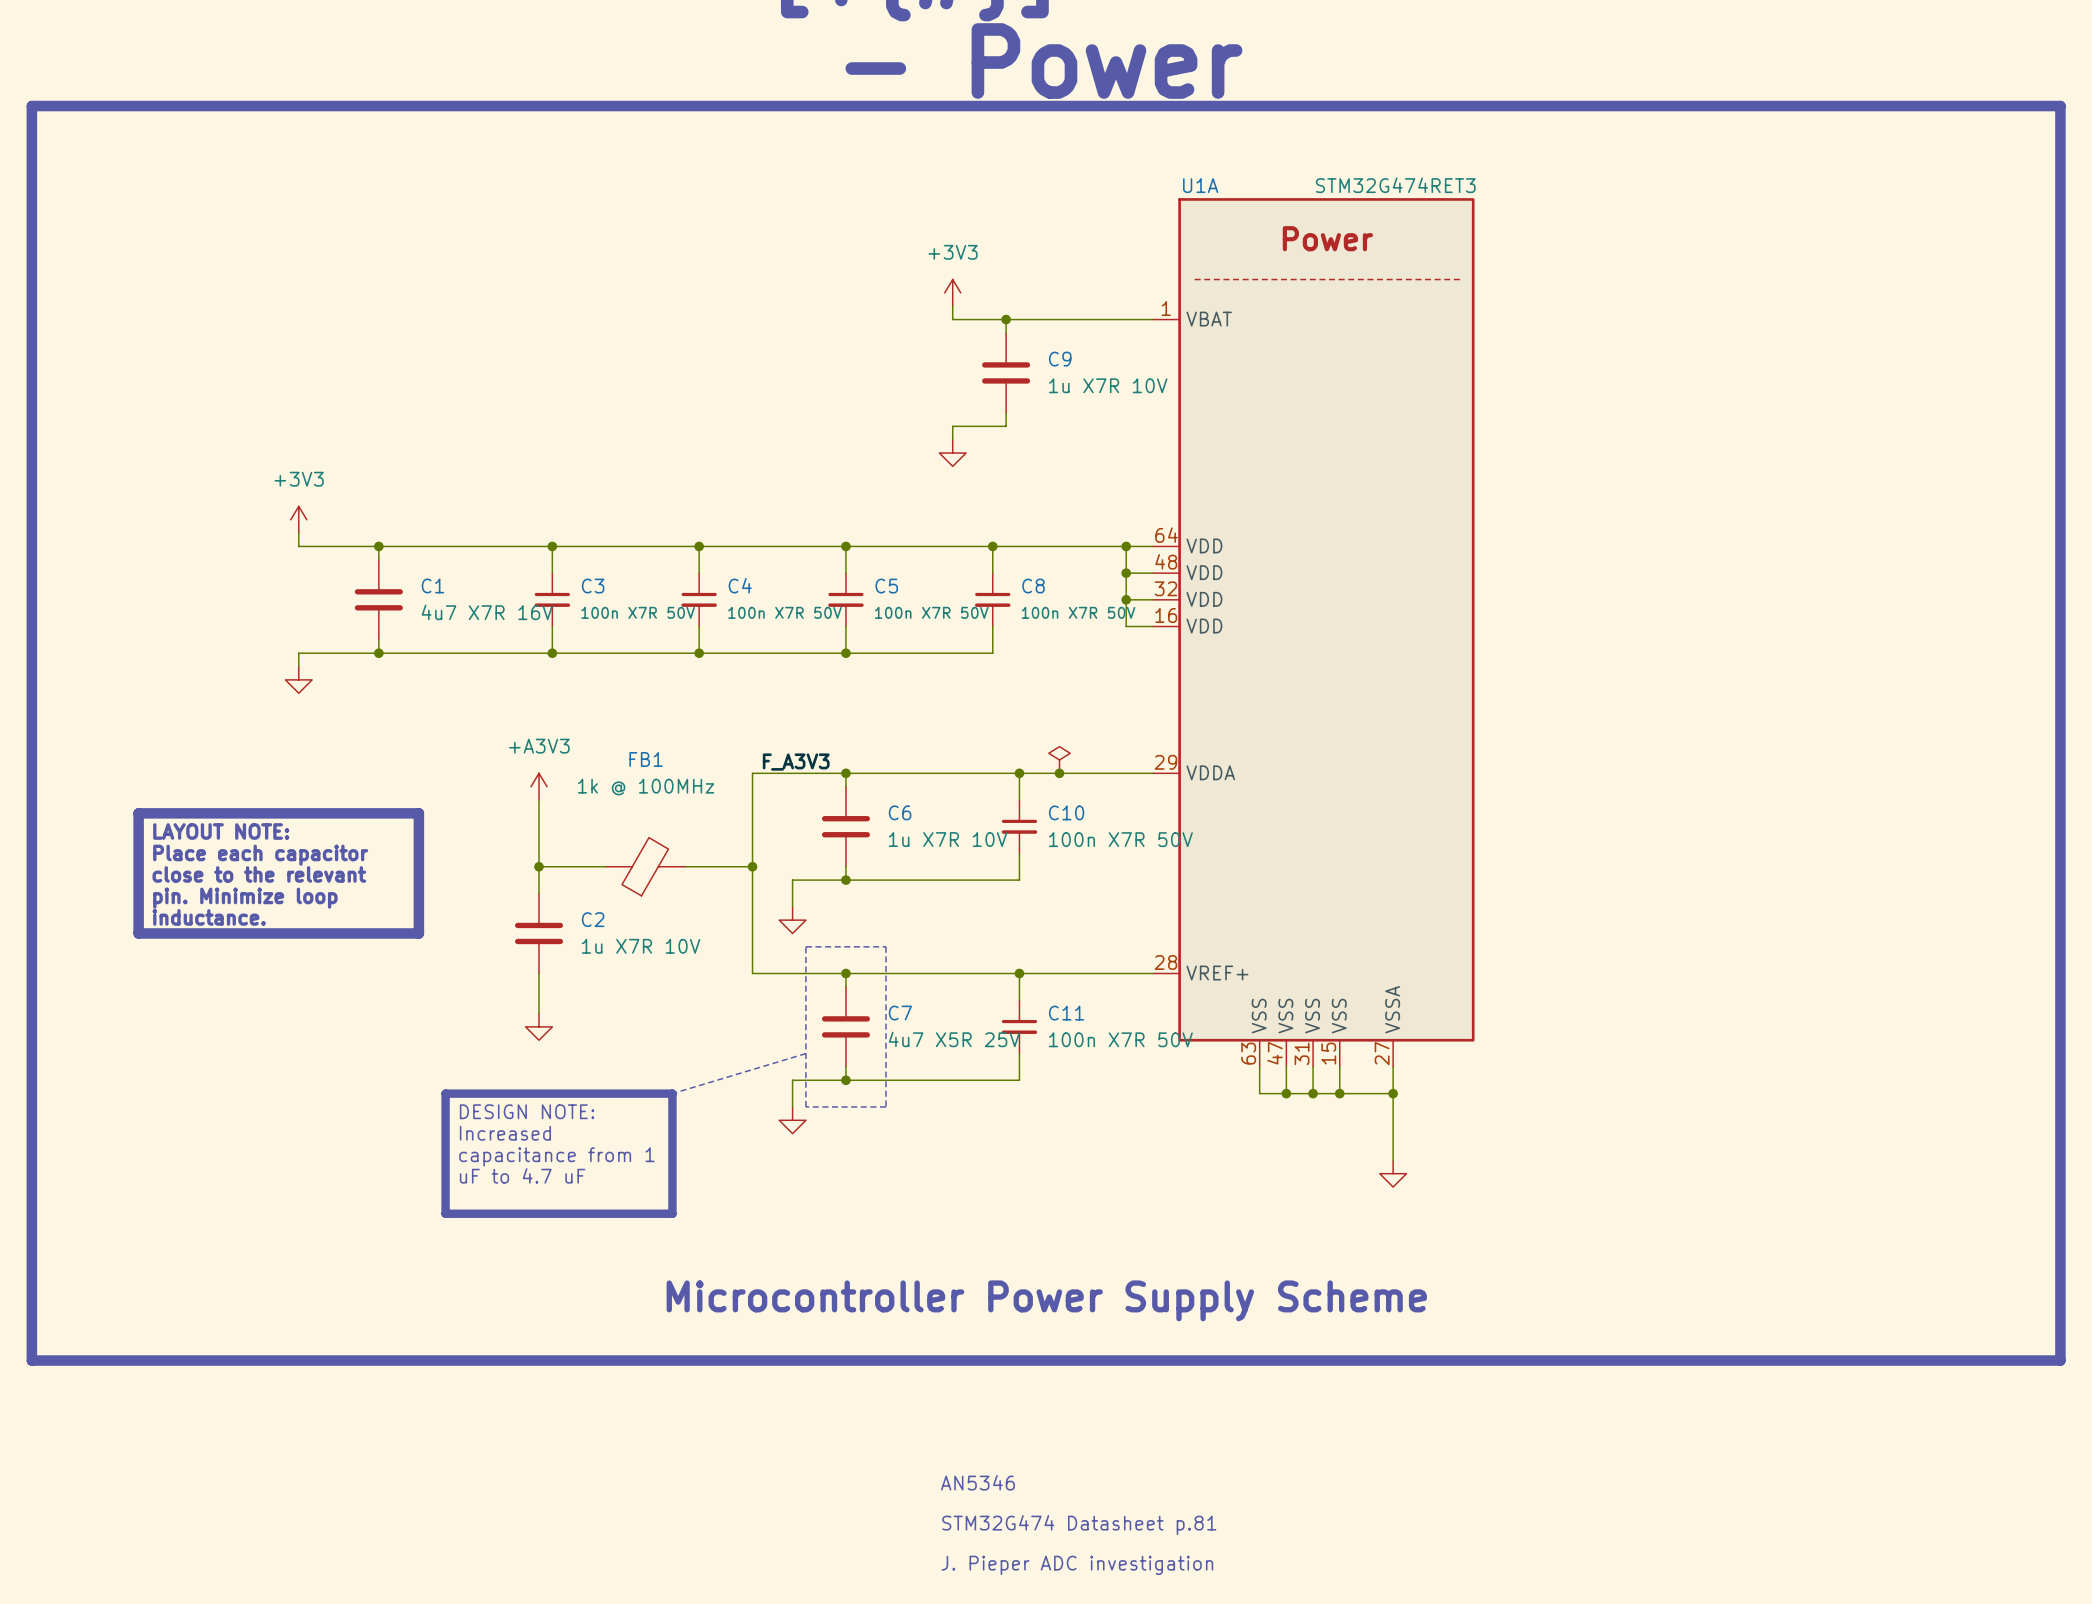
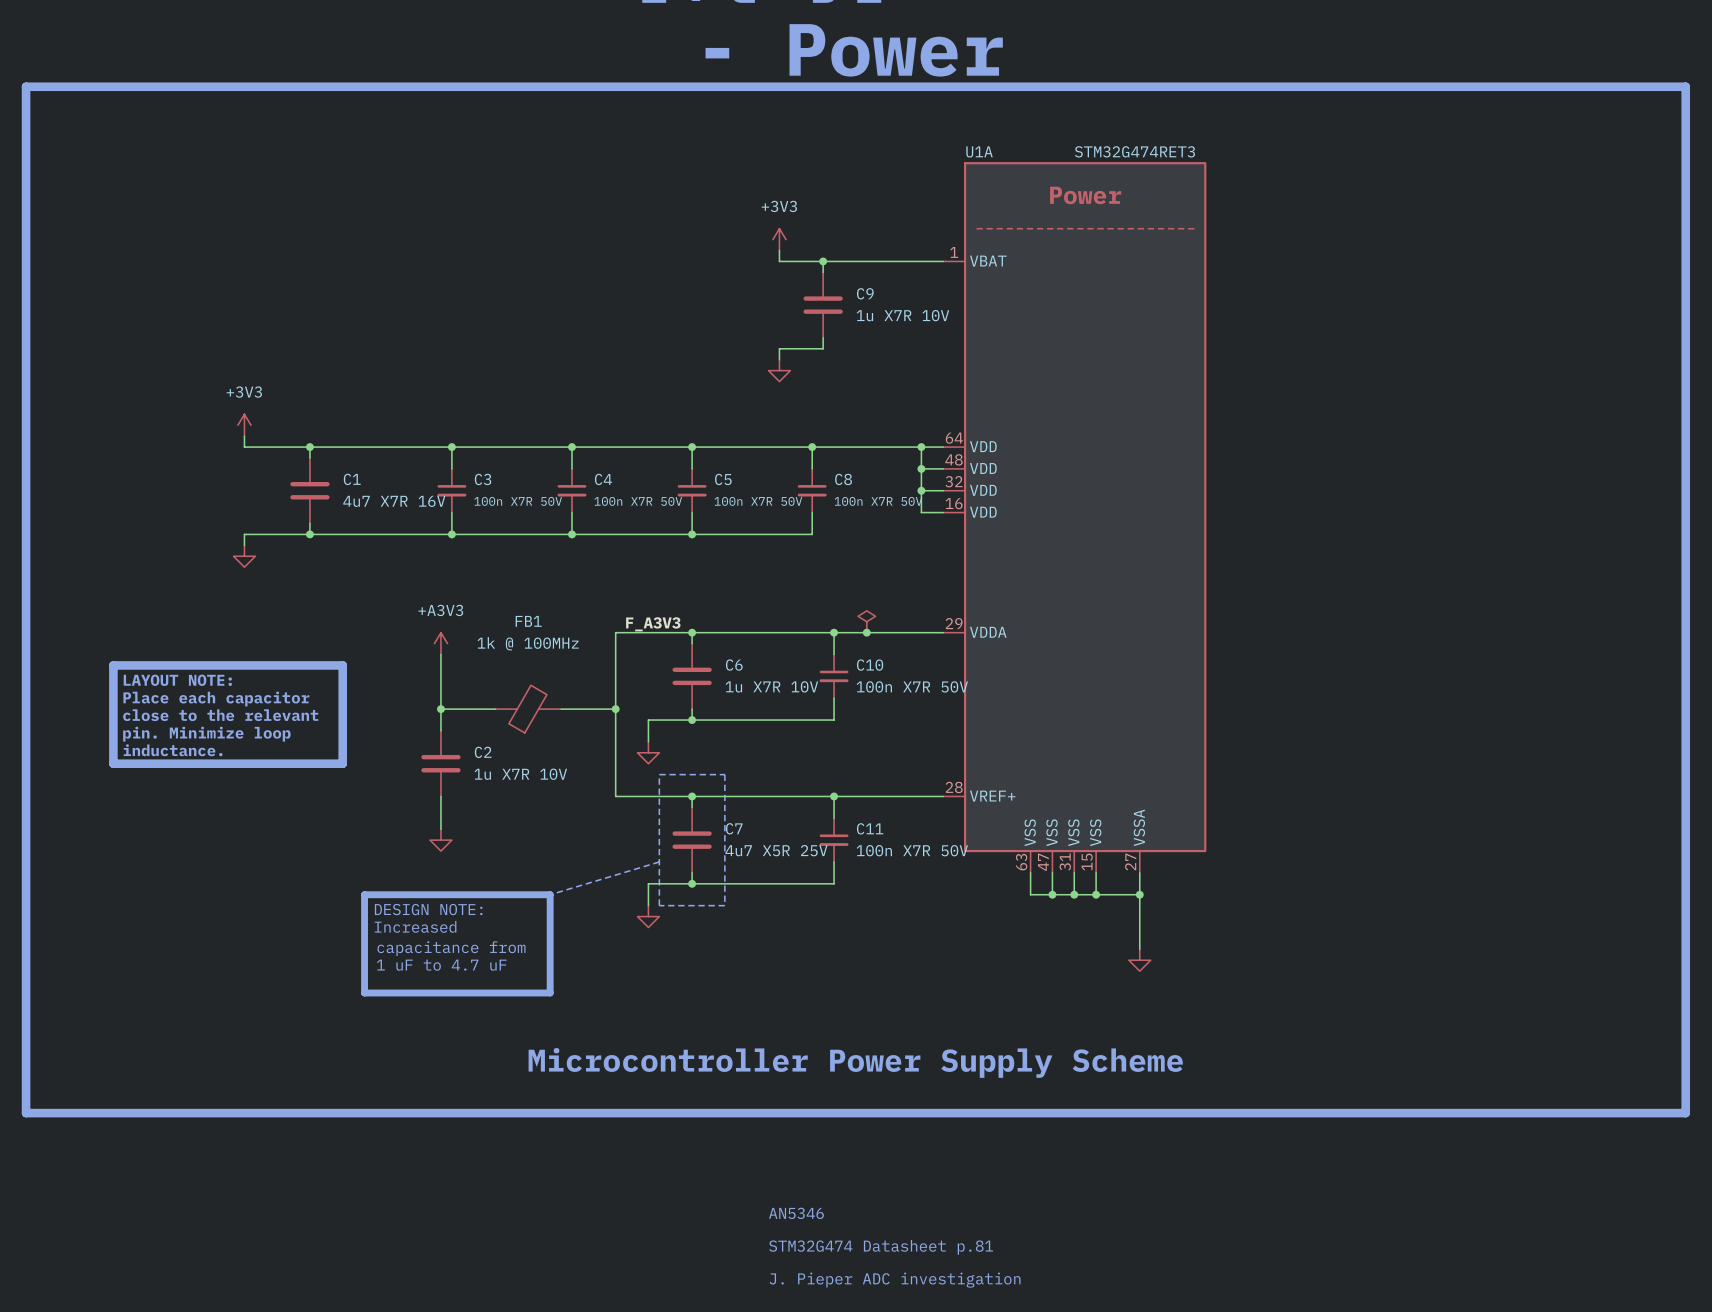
text: capacitance from 1 (556, 1156) -> capacitance from (451, 948)
text: uF to 4.7 uF (522, 1175) -> 1 uF to 4.7 uF (441, 965)

